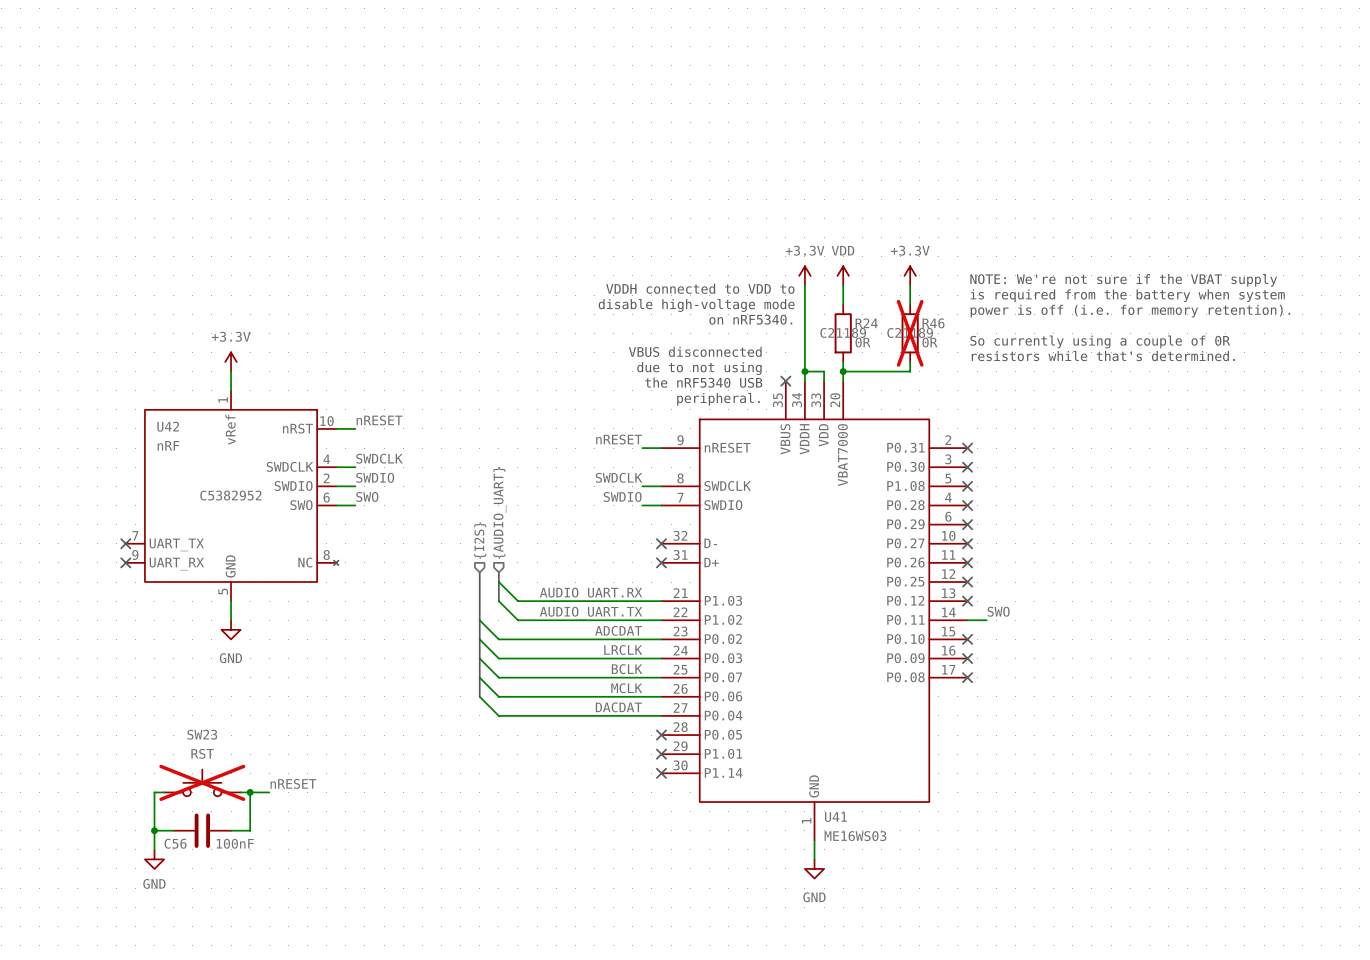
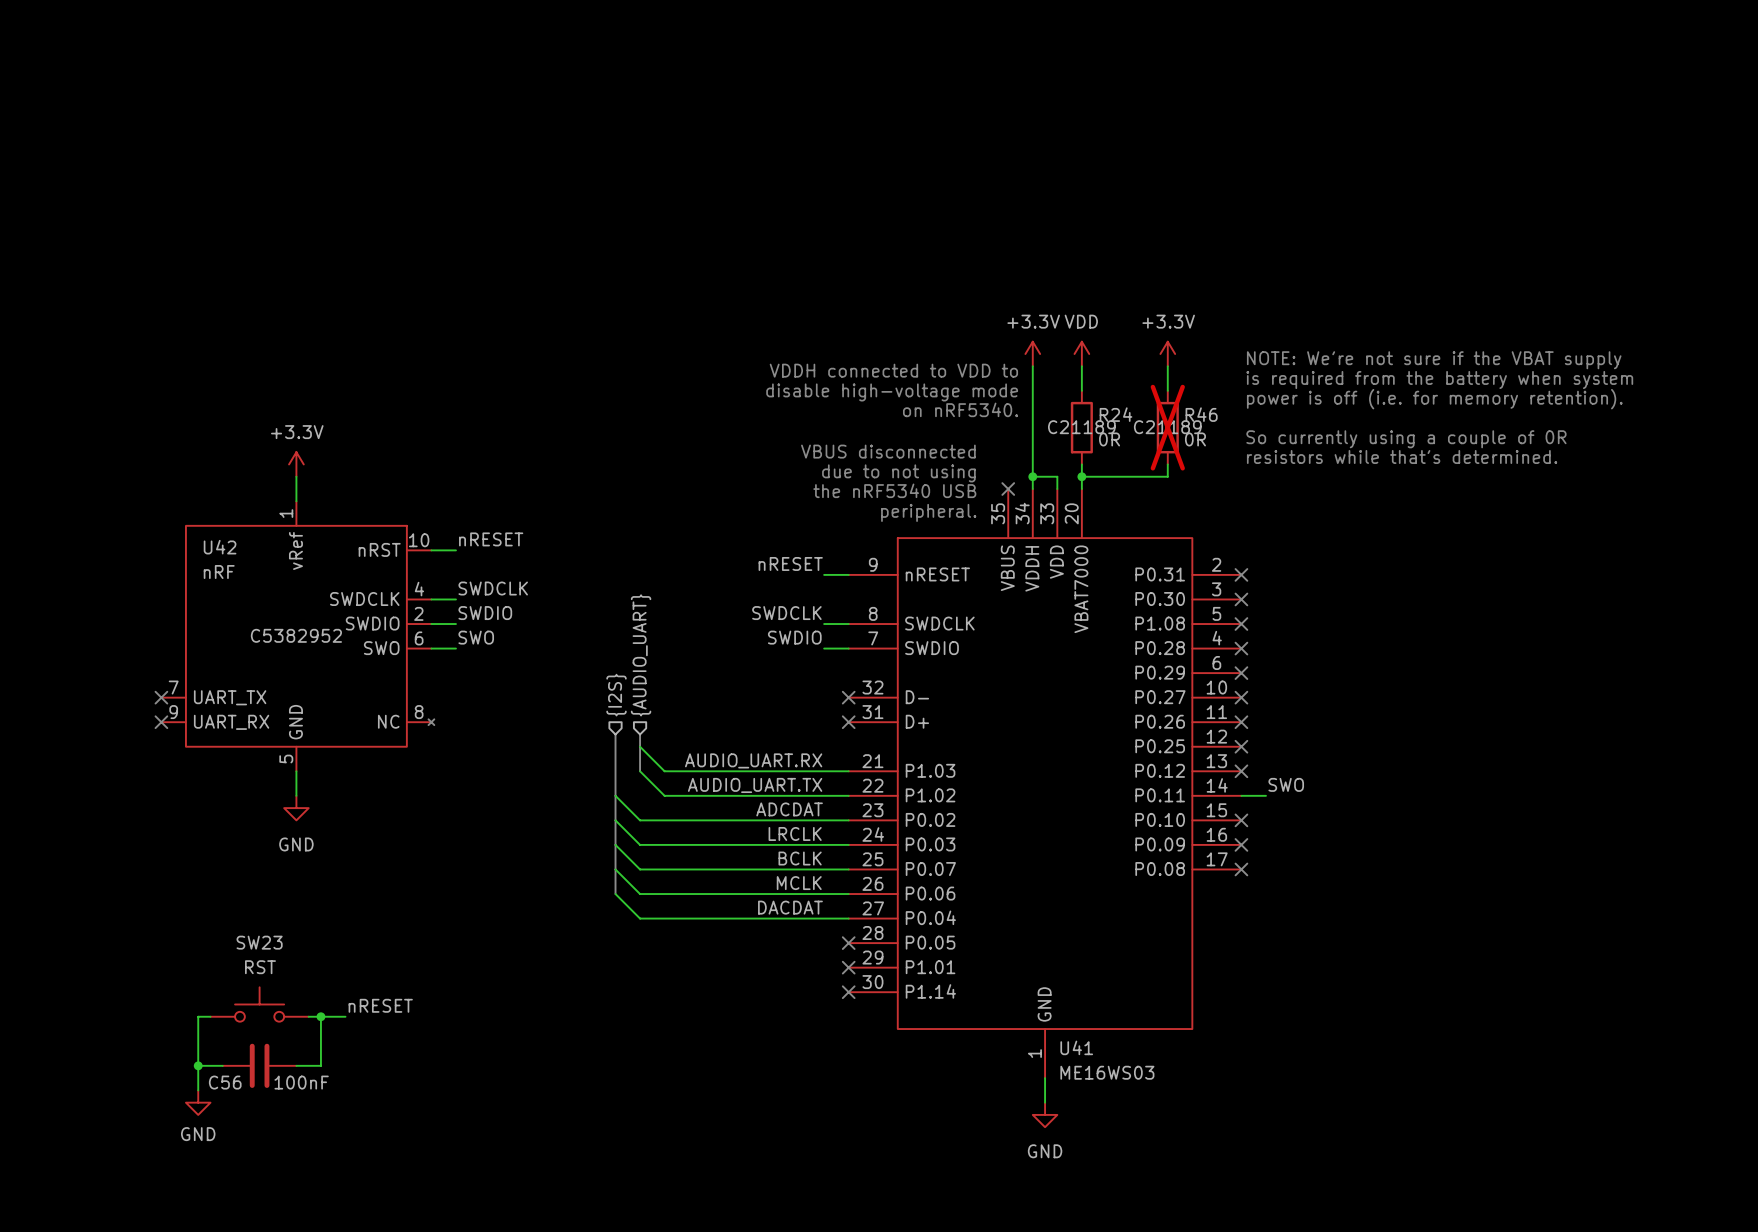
SW23 do-not-place cross: (202, 782) -> none

